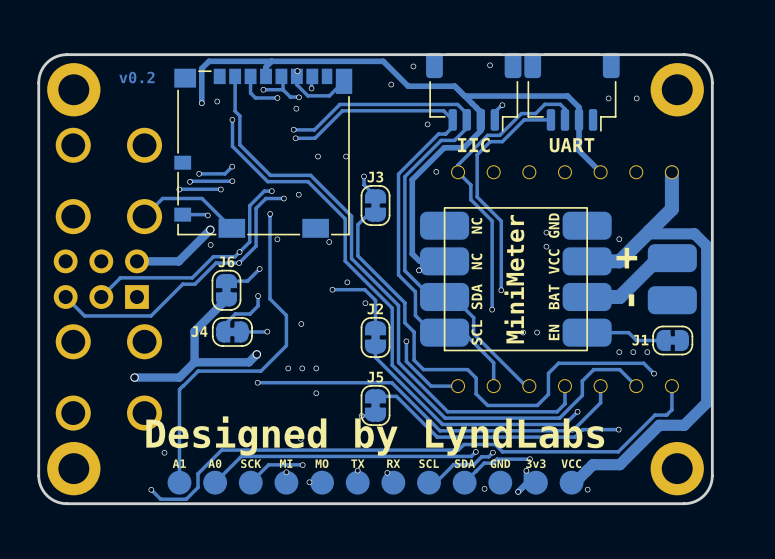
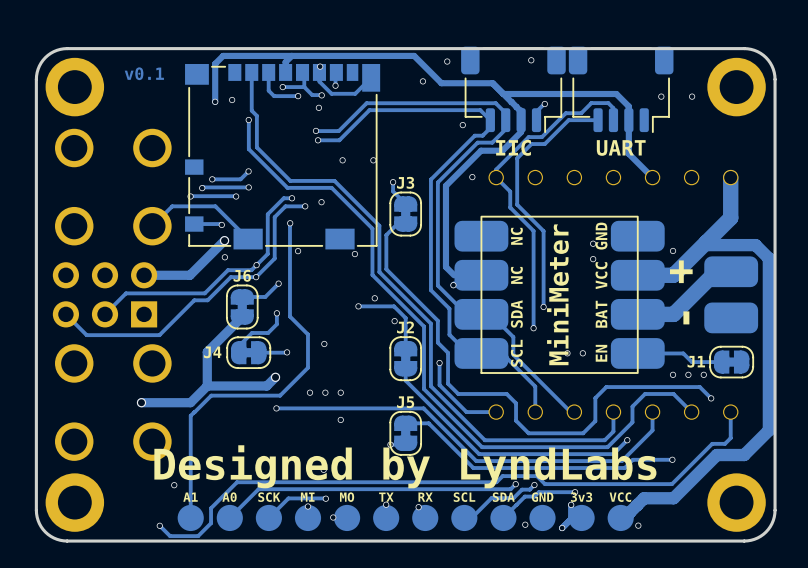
text: v0.2 (136, 77) -> v0.1 (144, 73)

